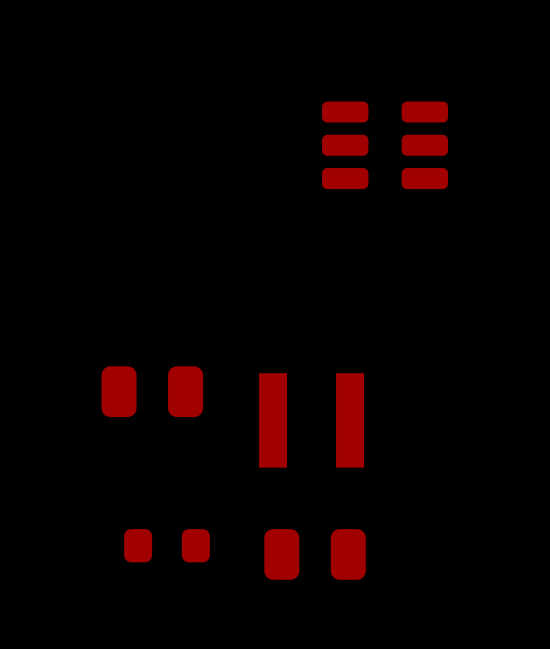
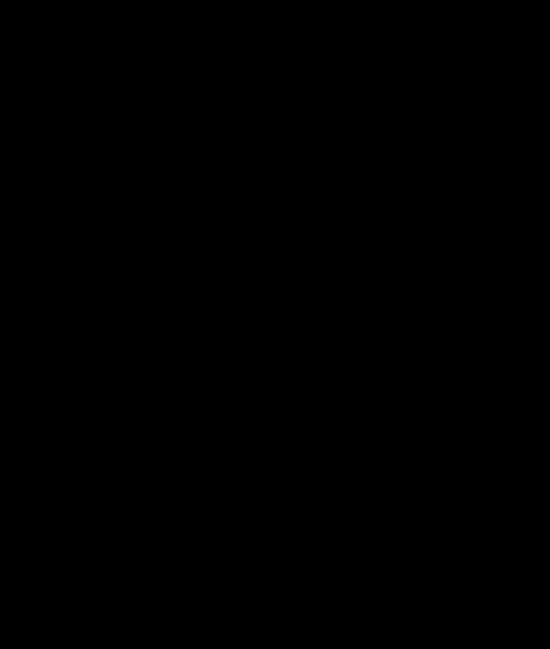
part: (385, 145) -> none
part: (152, 391) -> none
part: (311, 420) -> none
part: (166, 545) -> none
part: (315, 554) -> none

